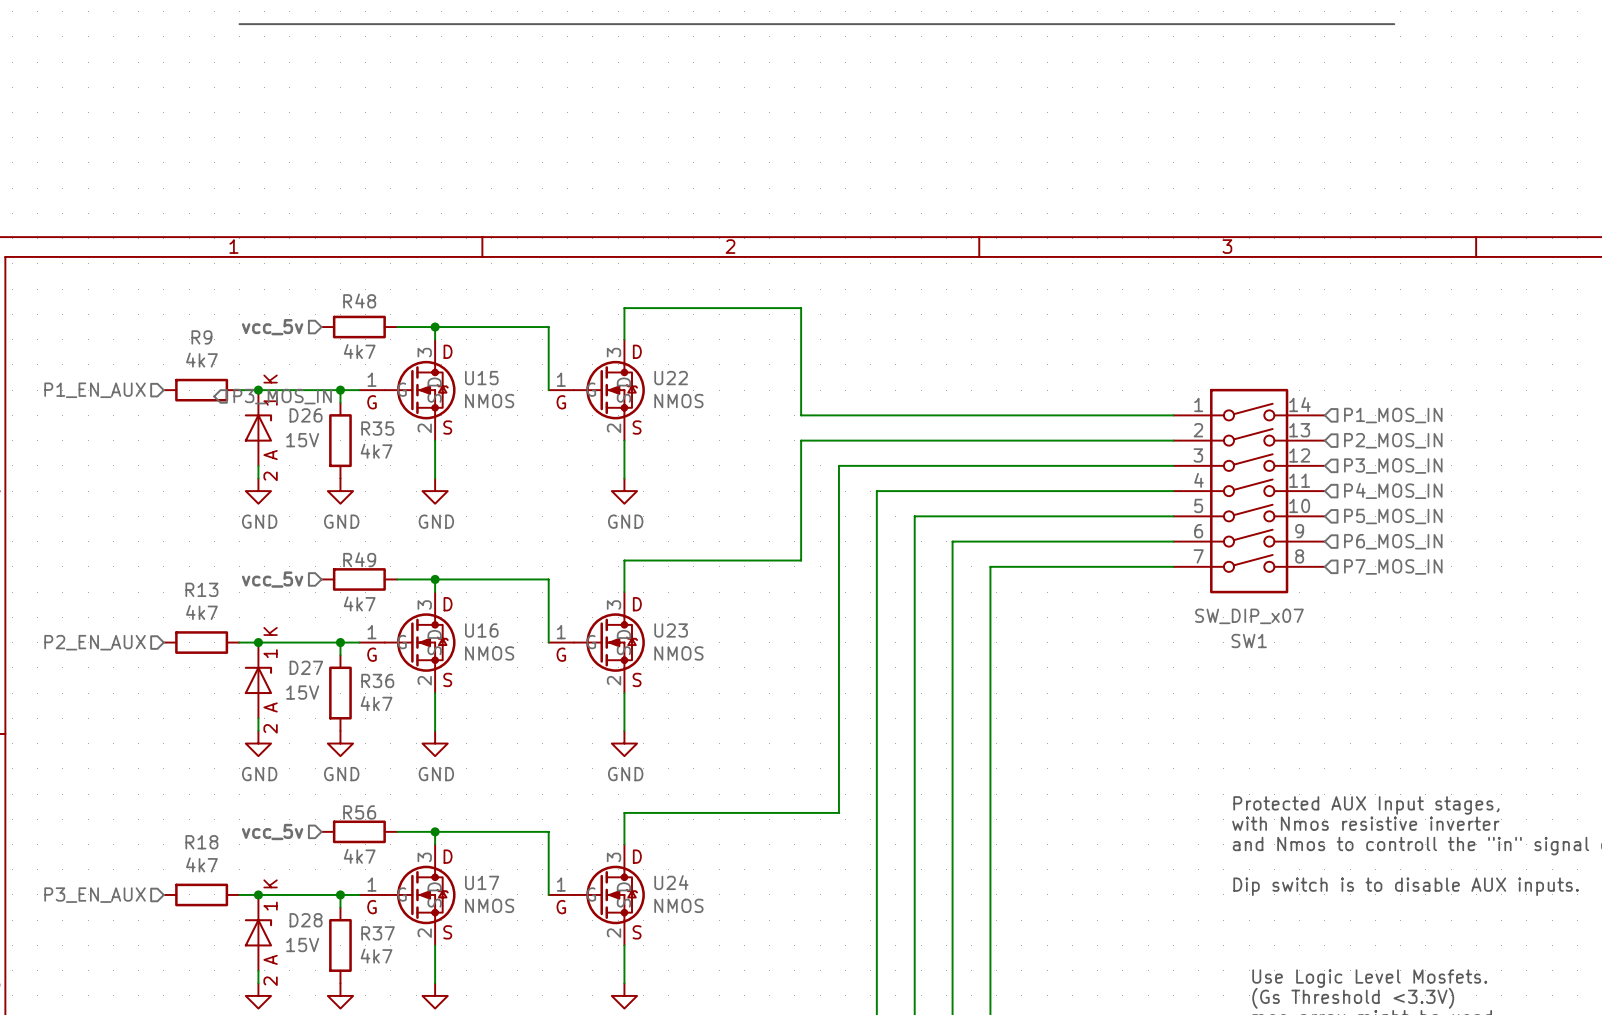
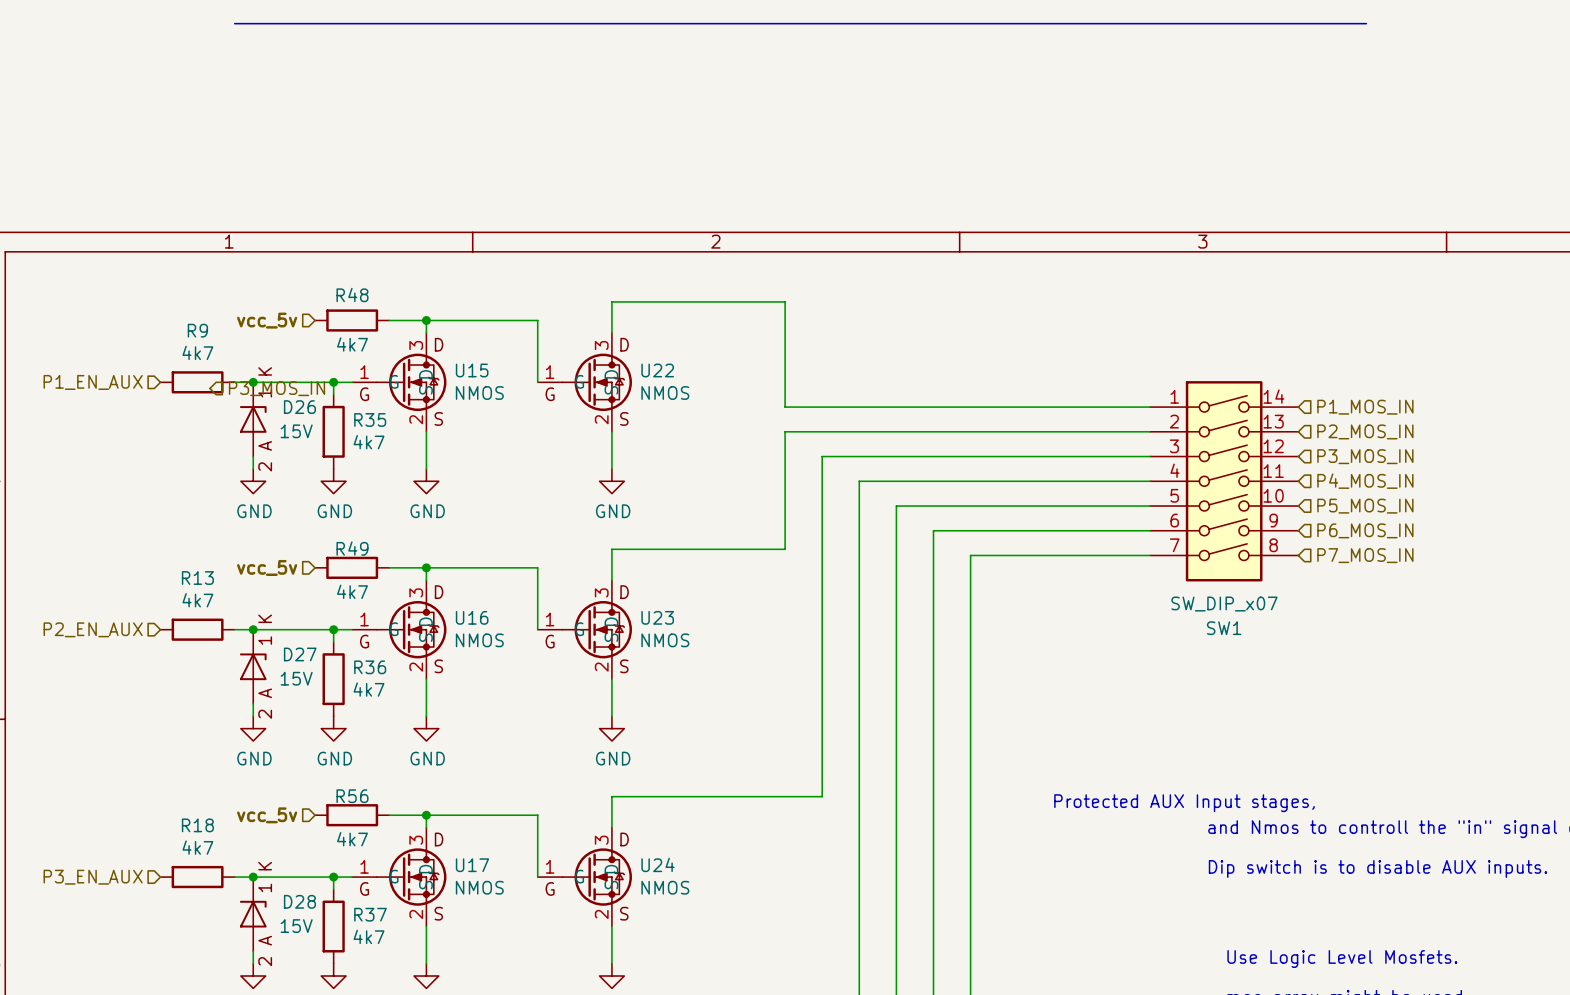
text position: Protected AUX Input stages, (1366, 805) -> Protected AUX Input stages, (1184, 803)
text: with Nmos resistive inverter (1365, 823) -> none
text: (Gs Threshold <3.3V) (1353, 998) -> none

